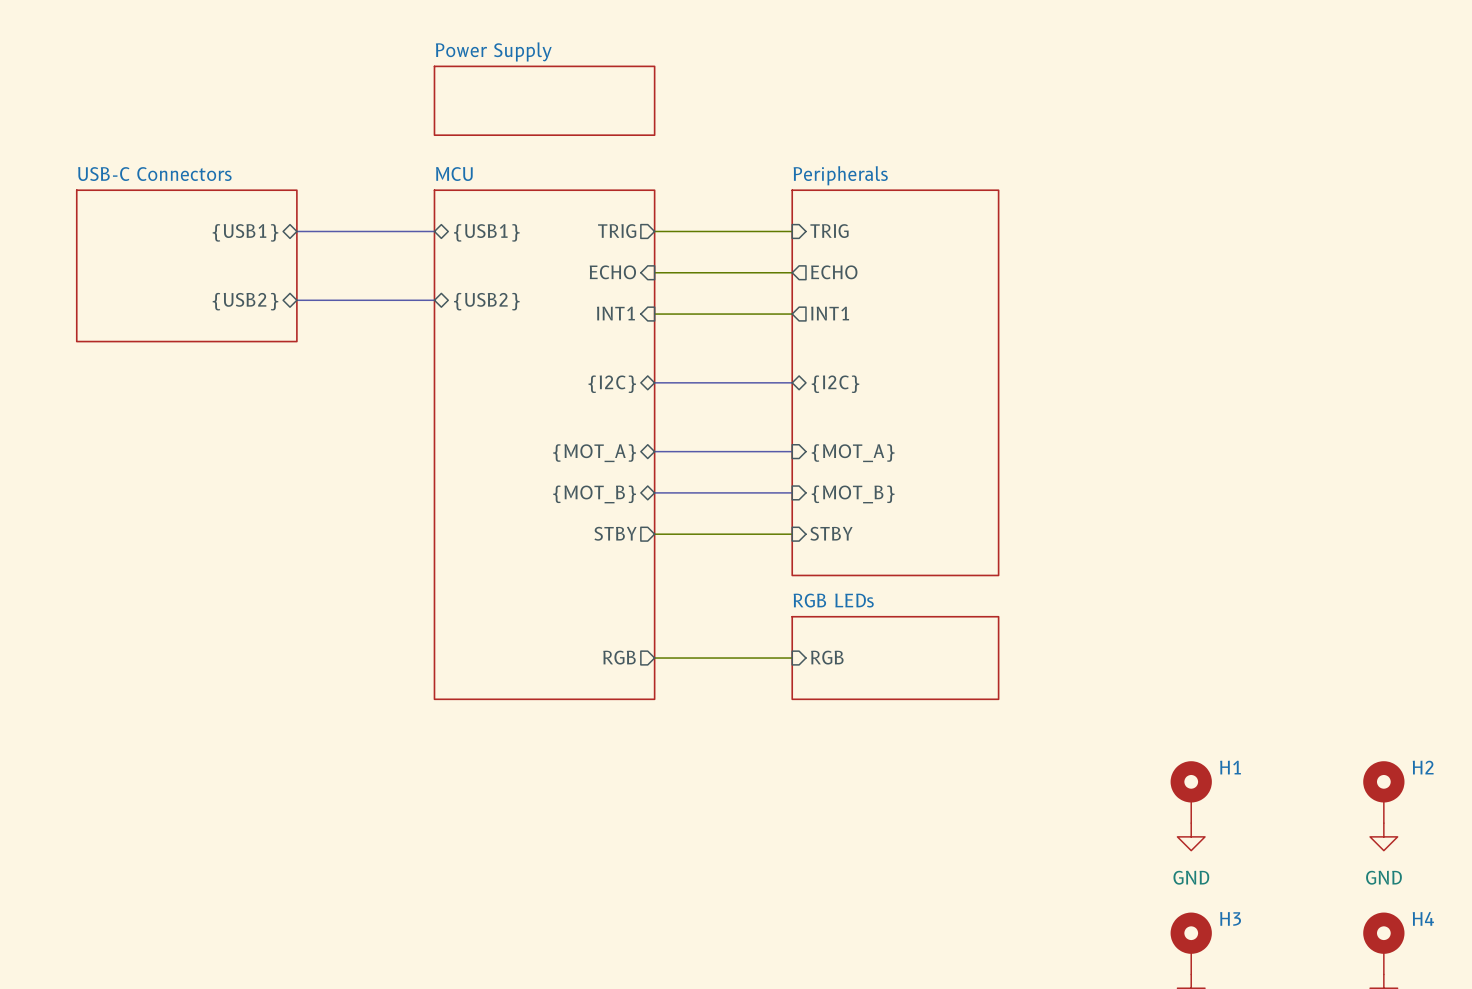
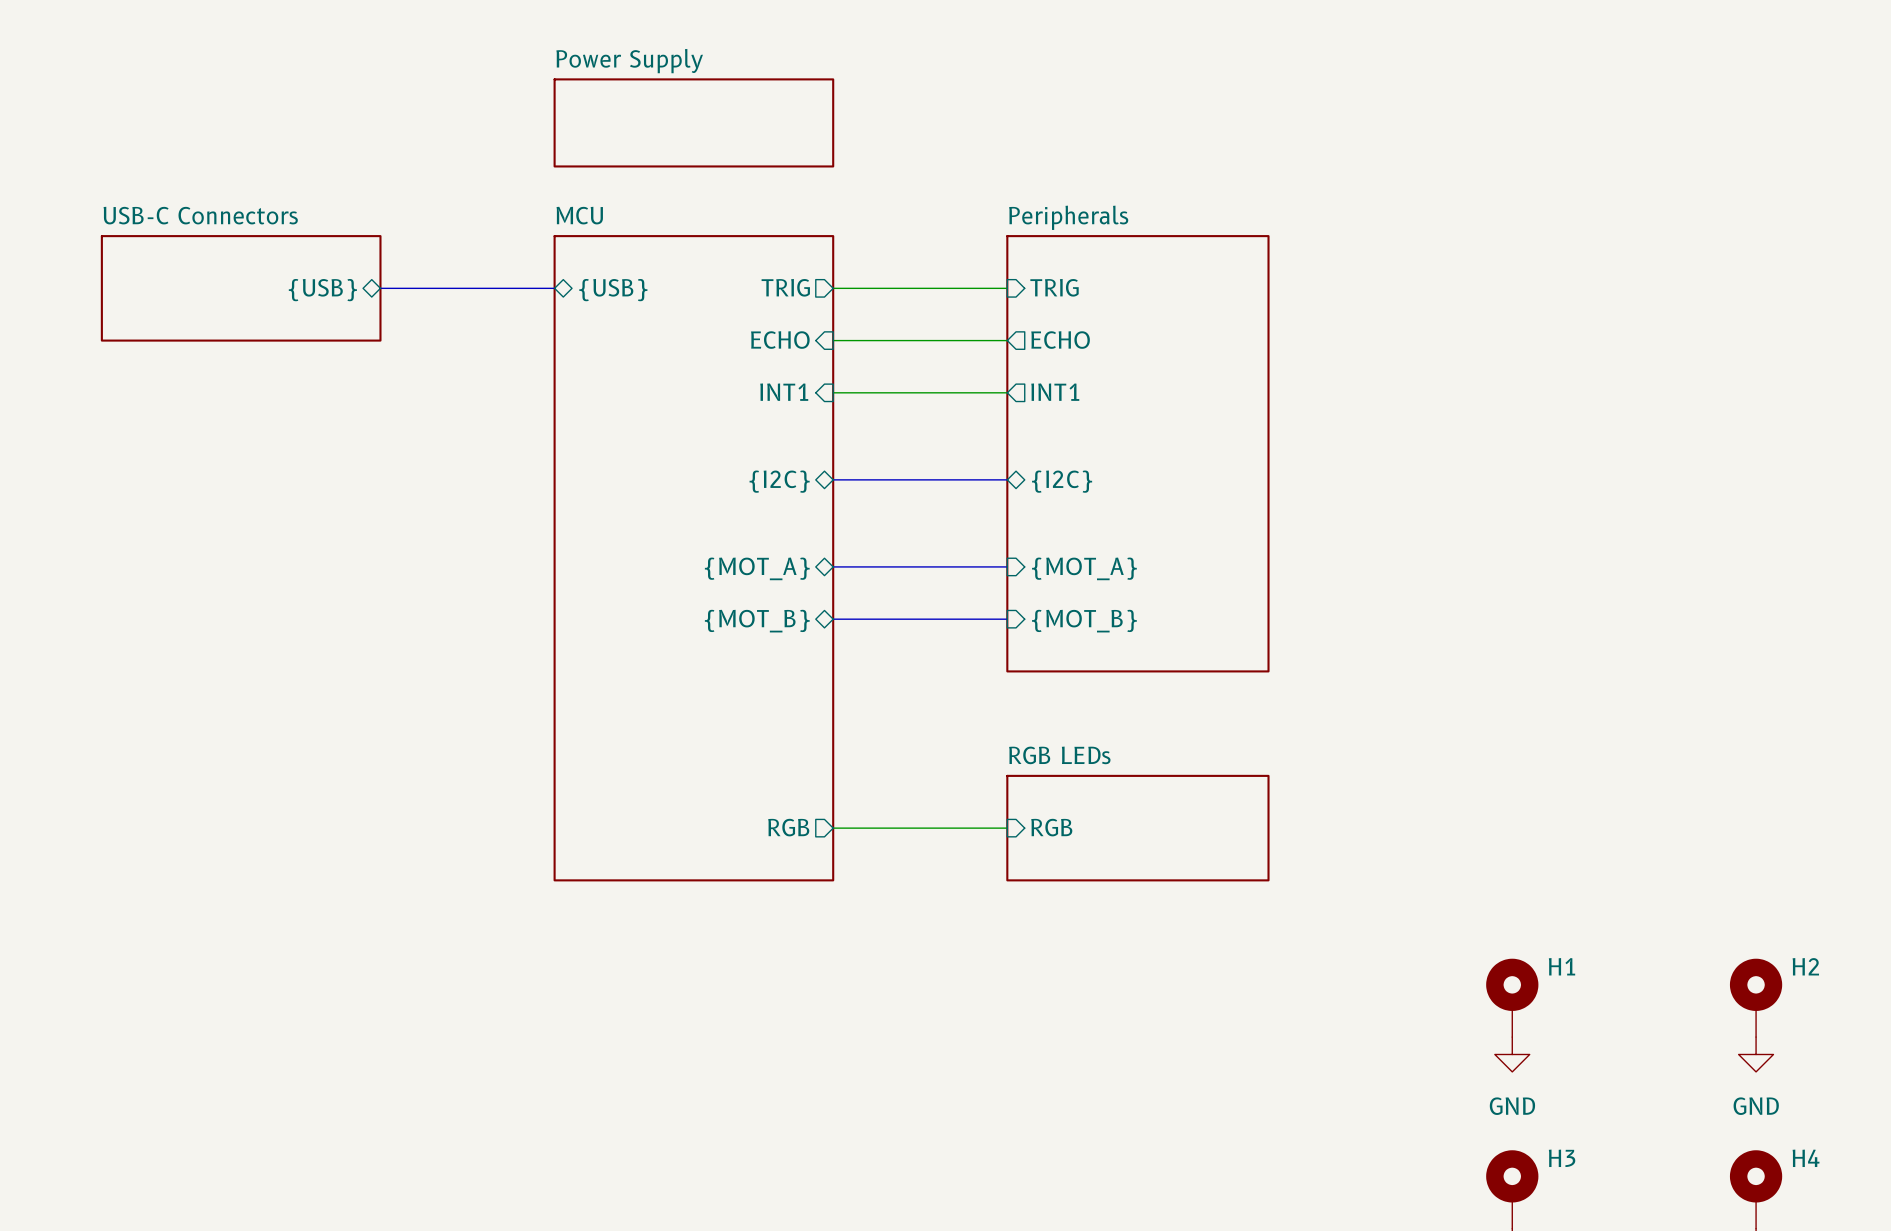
sheet USB-C Connectors: none -> (241, 288)
sheet pin: {USB1} (245, 232) -> {USB} (322, 290)
sheet pin: {USB1} (486, 232) -> {USB} (613, 290)
sheet USB-C Connectors: (186, 265) -> none
bus: (296, 300) (434, 300) -> none
sheet pin: {USB2} (245, 301) -> none
sheet pin: {USB2} (486, 301) -> none
sheet Peripherals: none -> (1137, 453)
sheet Peripherals: (895, 382) -> none
sheet pin: STBY (615, 533) -> none
sheet pin: STBY (831, 533) -> none
wire: (654, 534) (792, 534) -> none

